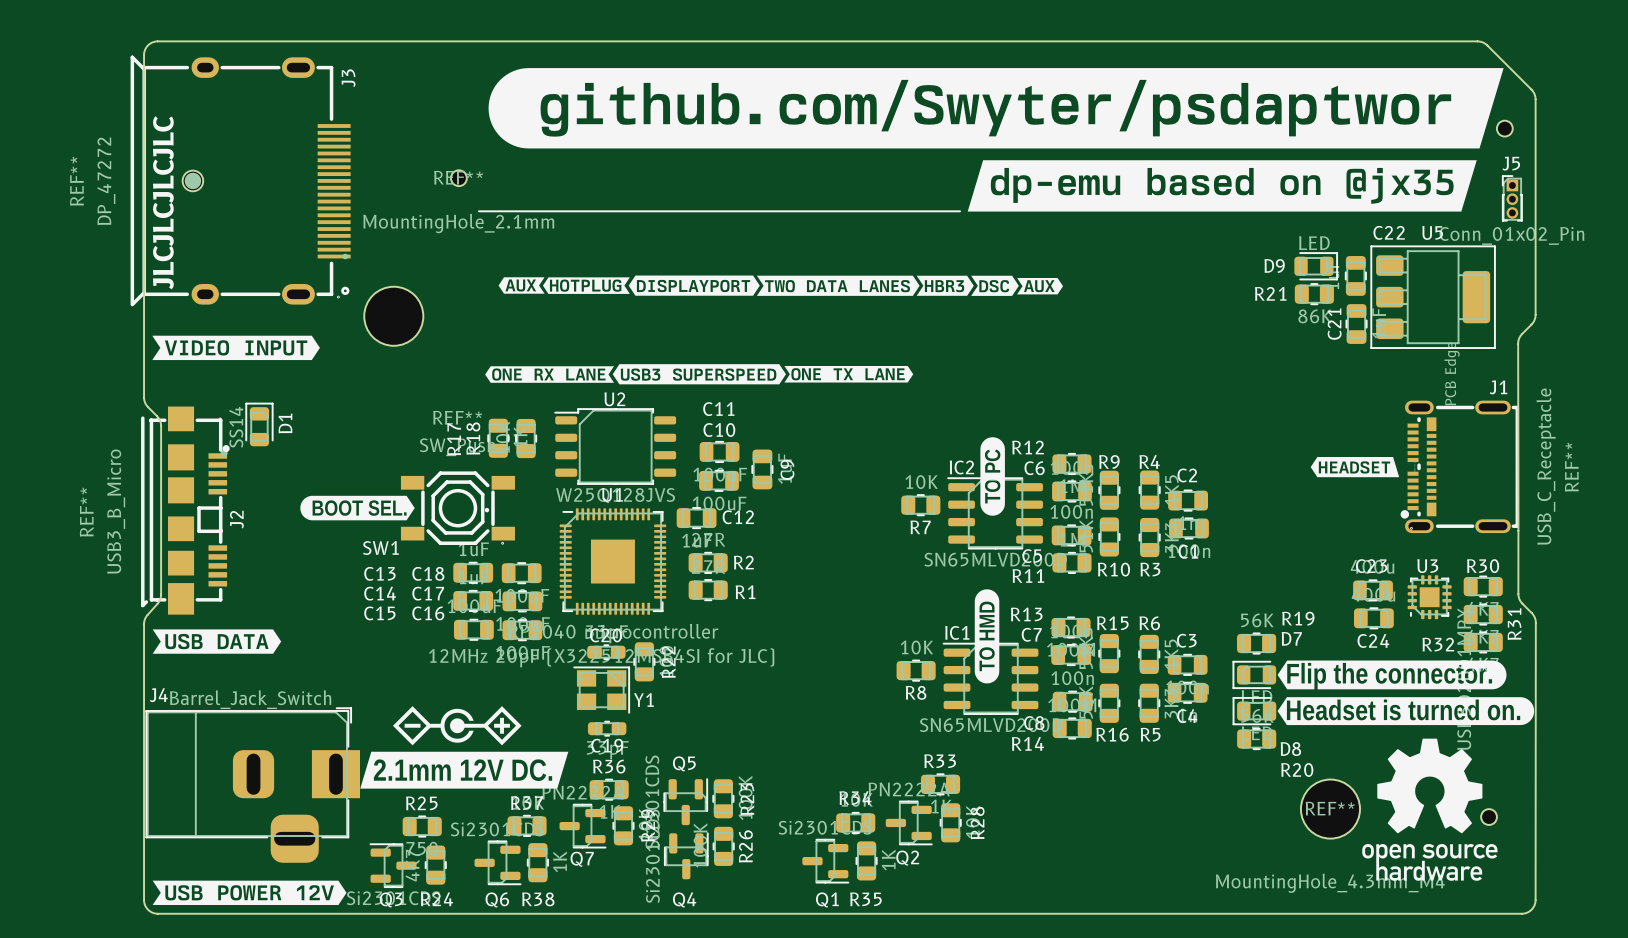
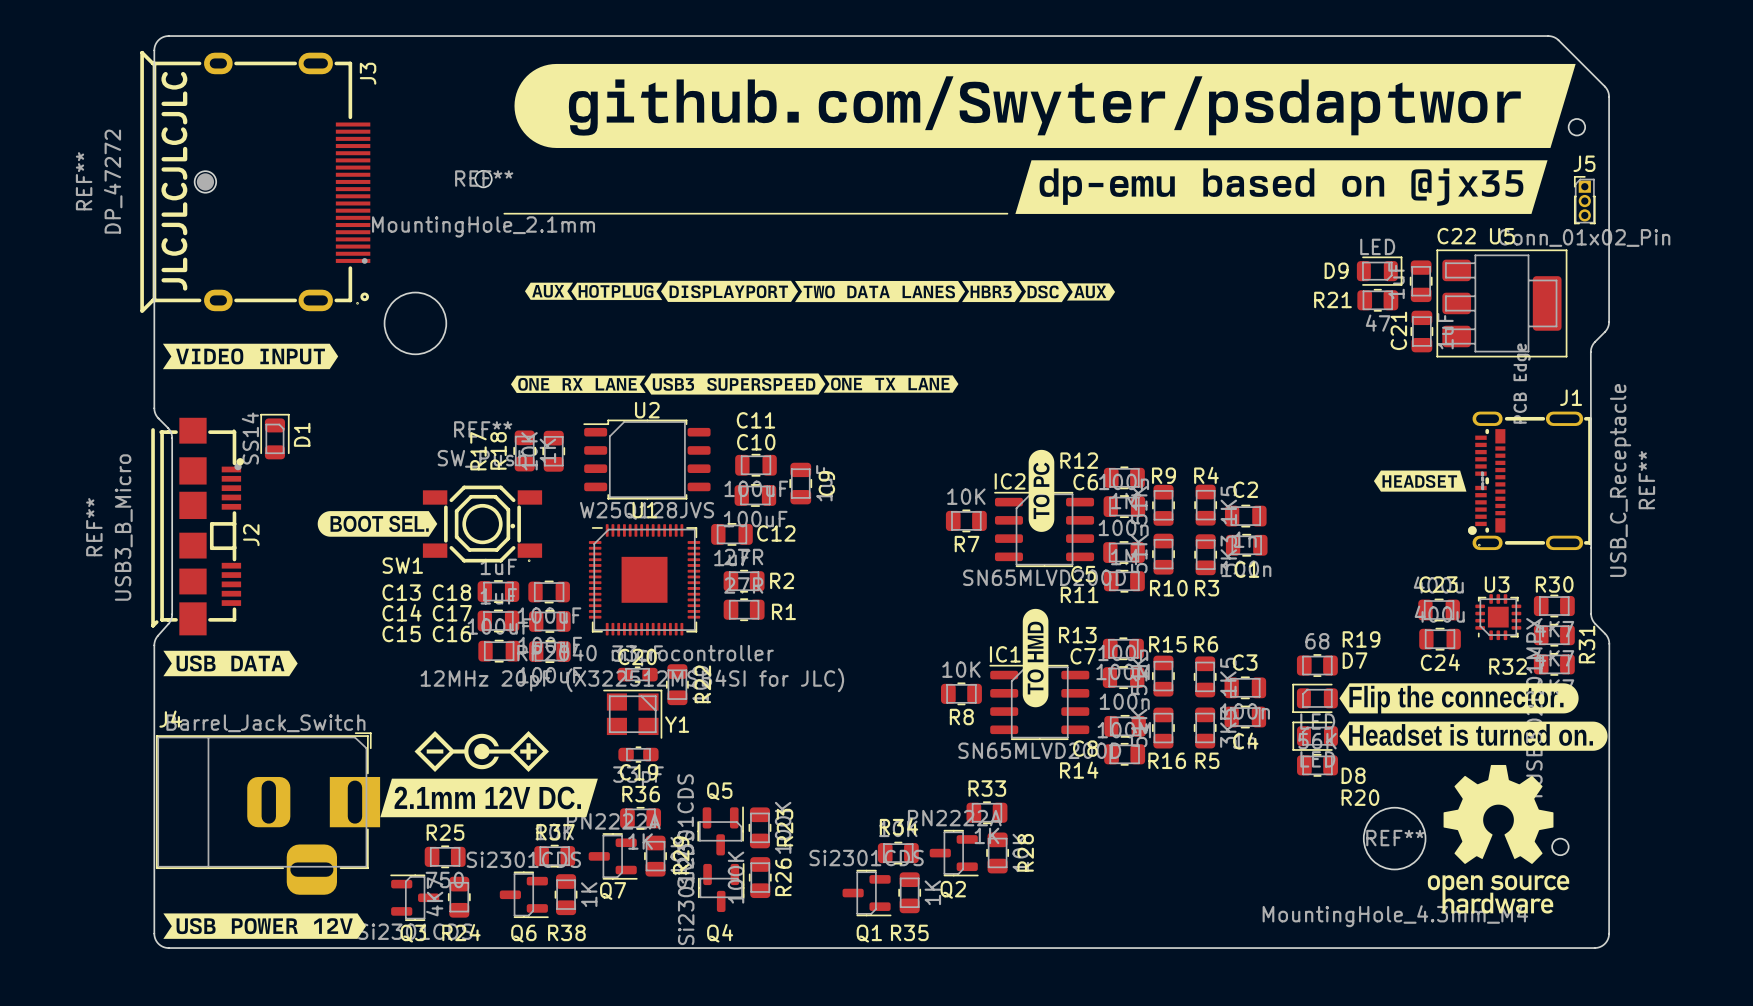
R21 value: 86K (1314, 316) -> 47 (1378, 323)
R19 value: 56K (1257, 620) -> 68 (1317, 641)

